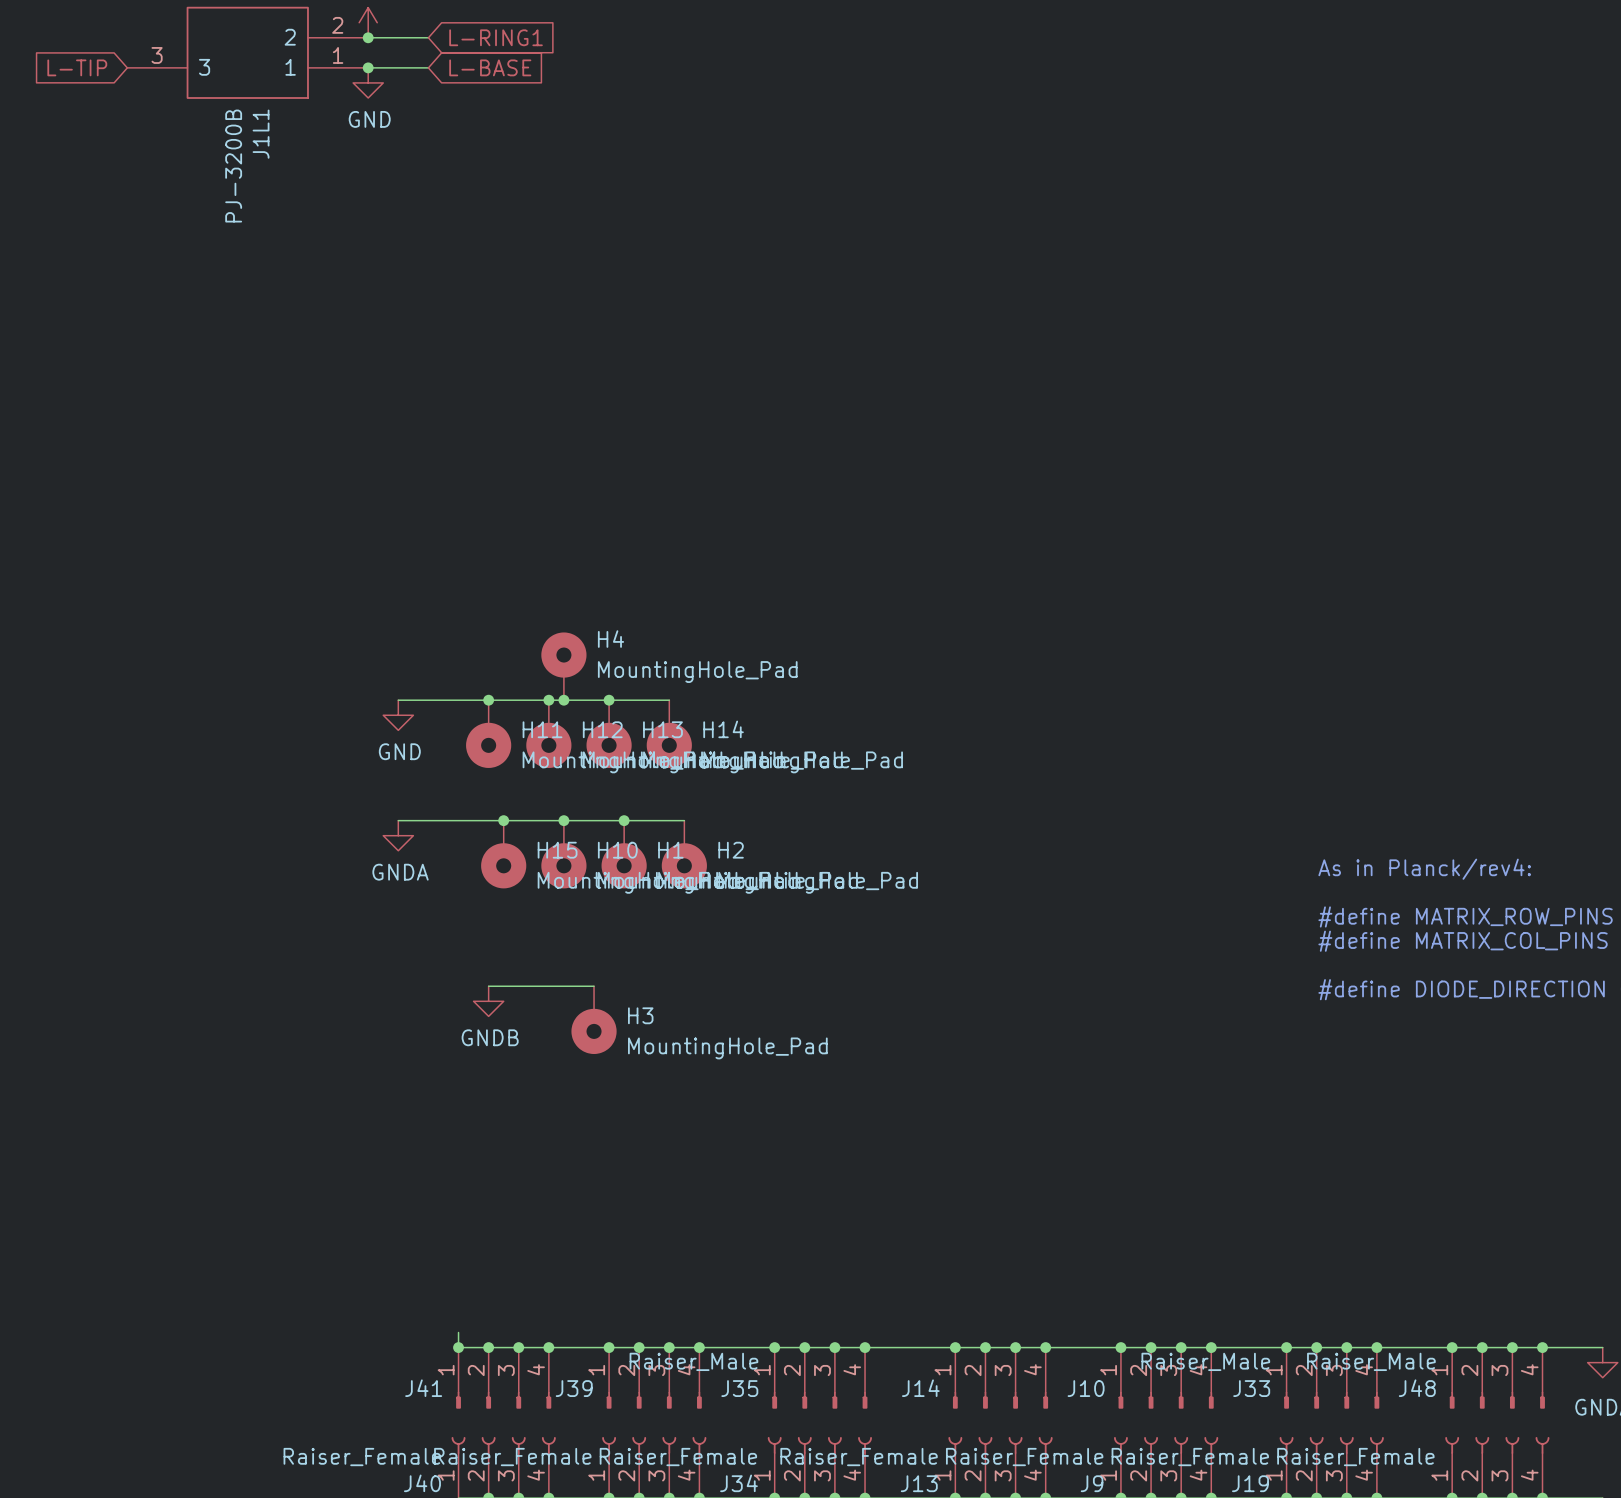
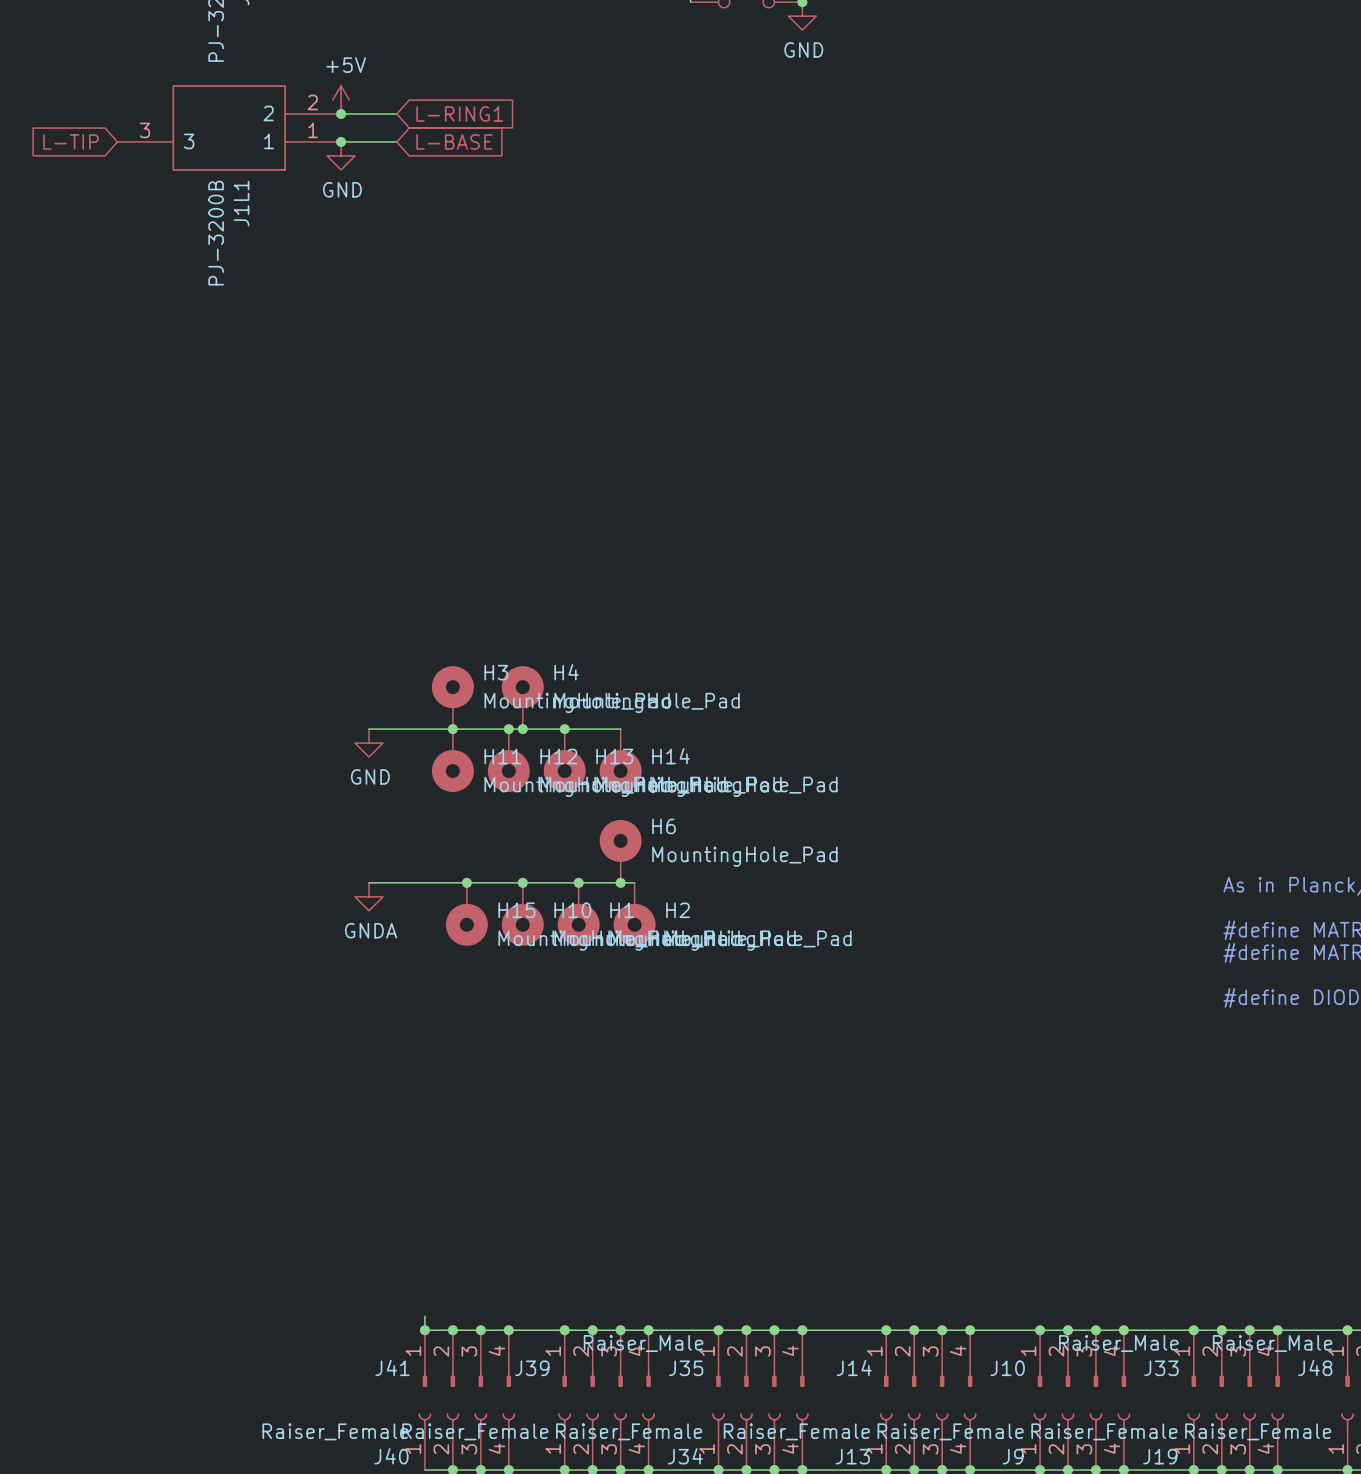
wire: (398, 820) (684, 820) -> (369, 882) (634, 882)
junction: (503, 820) -> none
junction: (563, 820) -> none
junction: (624, 820) -> none
H6: none -> MountingHole_Pad (620, 851)
power symbol position: GNDA (398, 835) -> GNDA (369, 896)
H15 position: (503, 854) -> (466, 914)
H10 position: (563, 854) -> (522, 914)
H1 position: (624, 854) -> (578, 914)
H2 position: (684, 854) -> (634, 914)
junction: none -> (466, 882)
junction: none -> (522, 882)
junction: none -> (578, 882)
junction: none -> (620, 882)
wire: (488, 986) (594, 986) -> none
power symbol: GNDB (488, 1001) -> none
H3 position: (594, 1020) -> (452, 697)
H3 rotation: 0° (594, 1031) -> 180° (452, 687)

